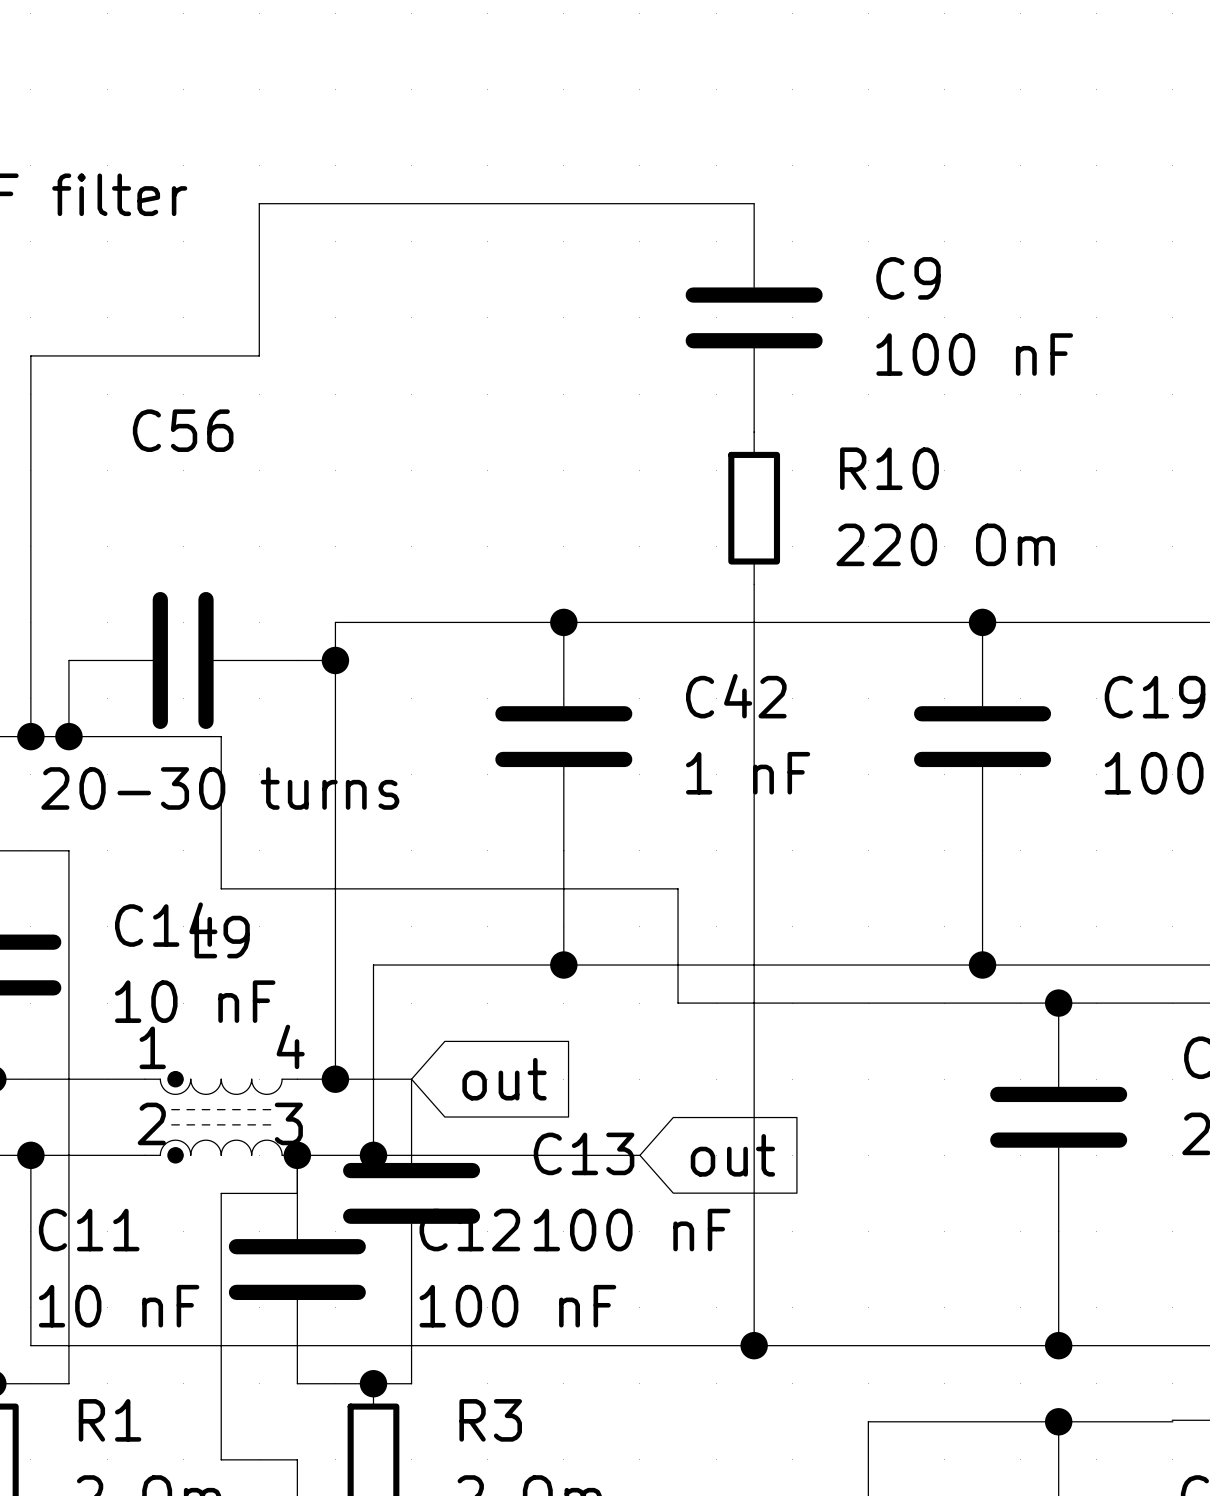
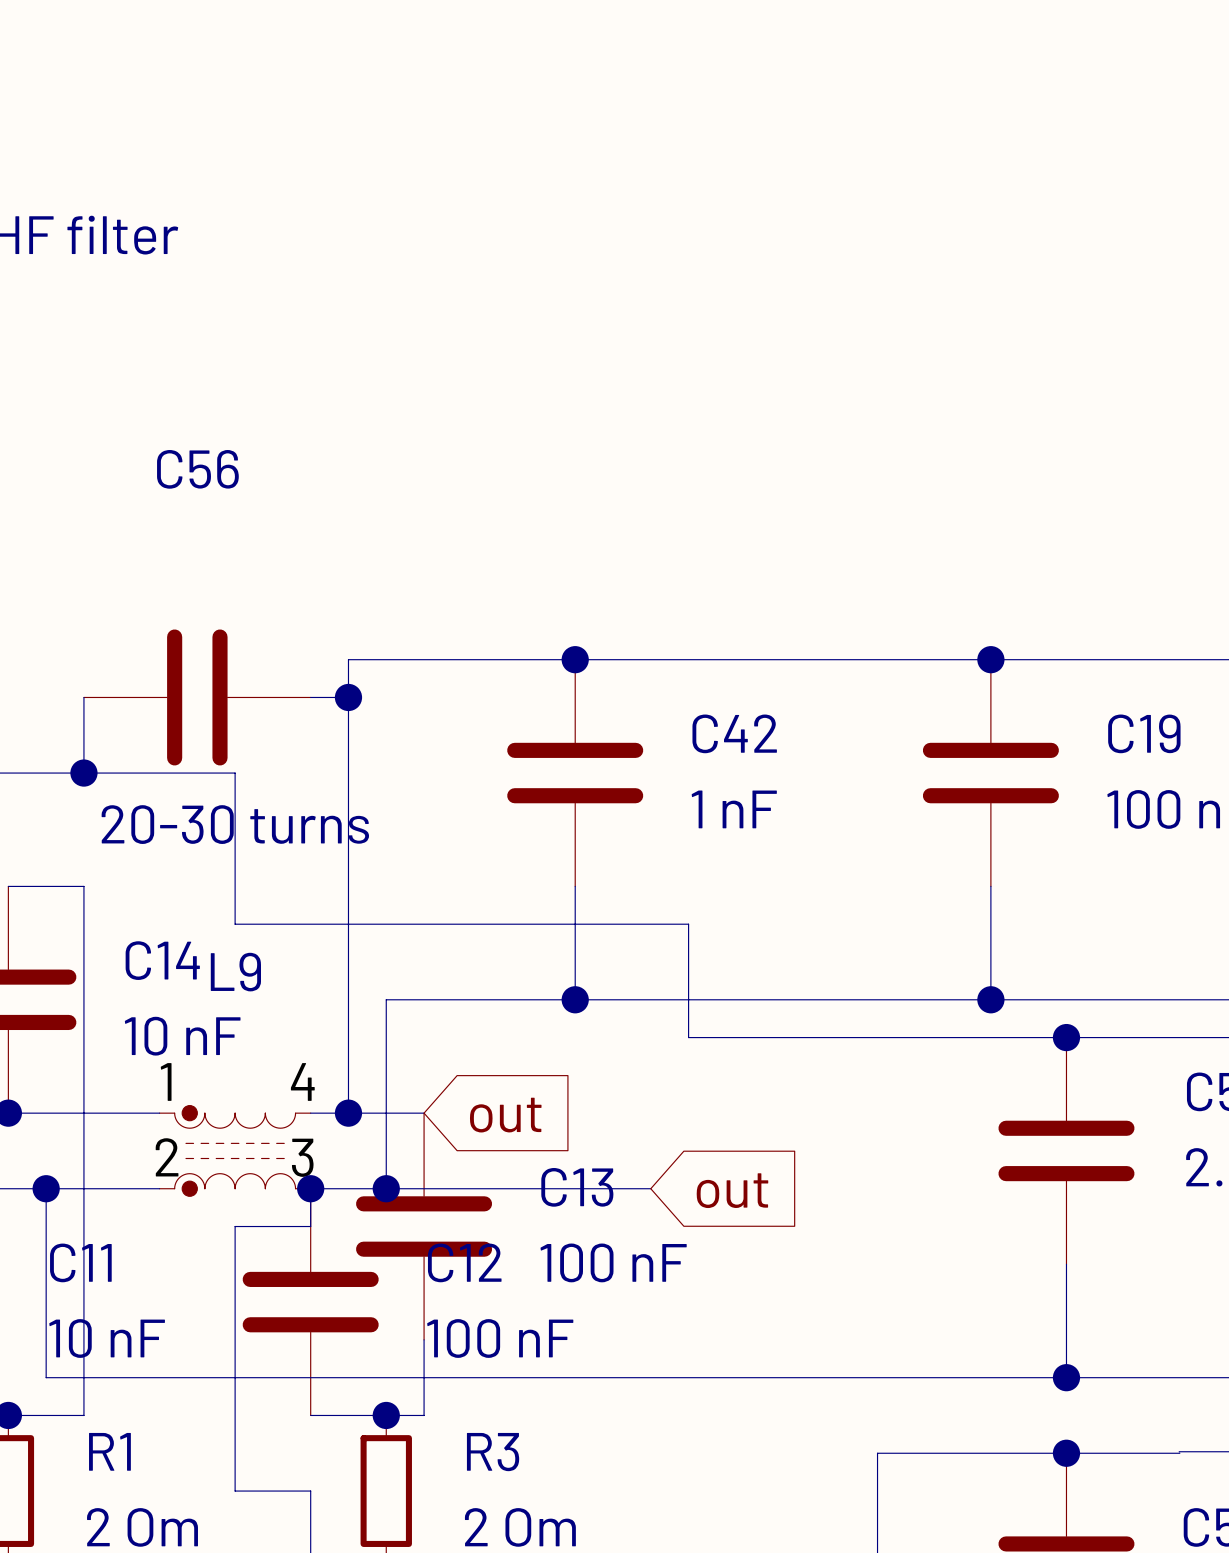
wire: (754, 203) (259, 203) (259, 355) (30, 355) (30, 736) -> none
C9: 100 nF (754, 317) -> none
R10: 220 Om (754, 508) -> none
wire: (754, 584) (754, 1345) -> none
junction: (30, 736) -> none
junction: (754, 1345) -> none

